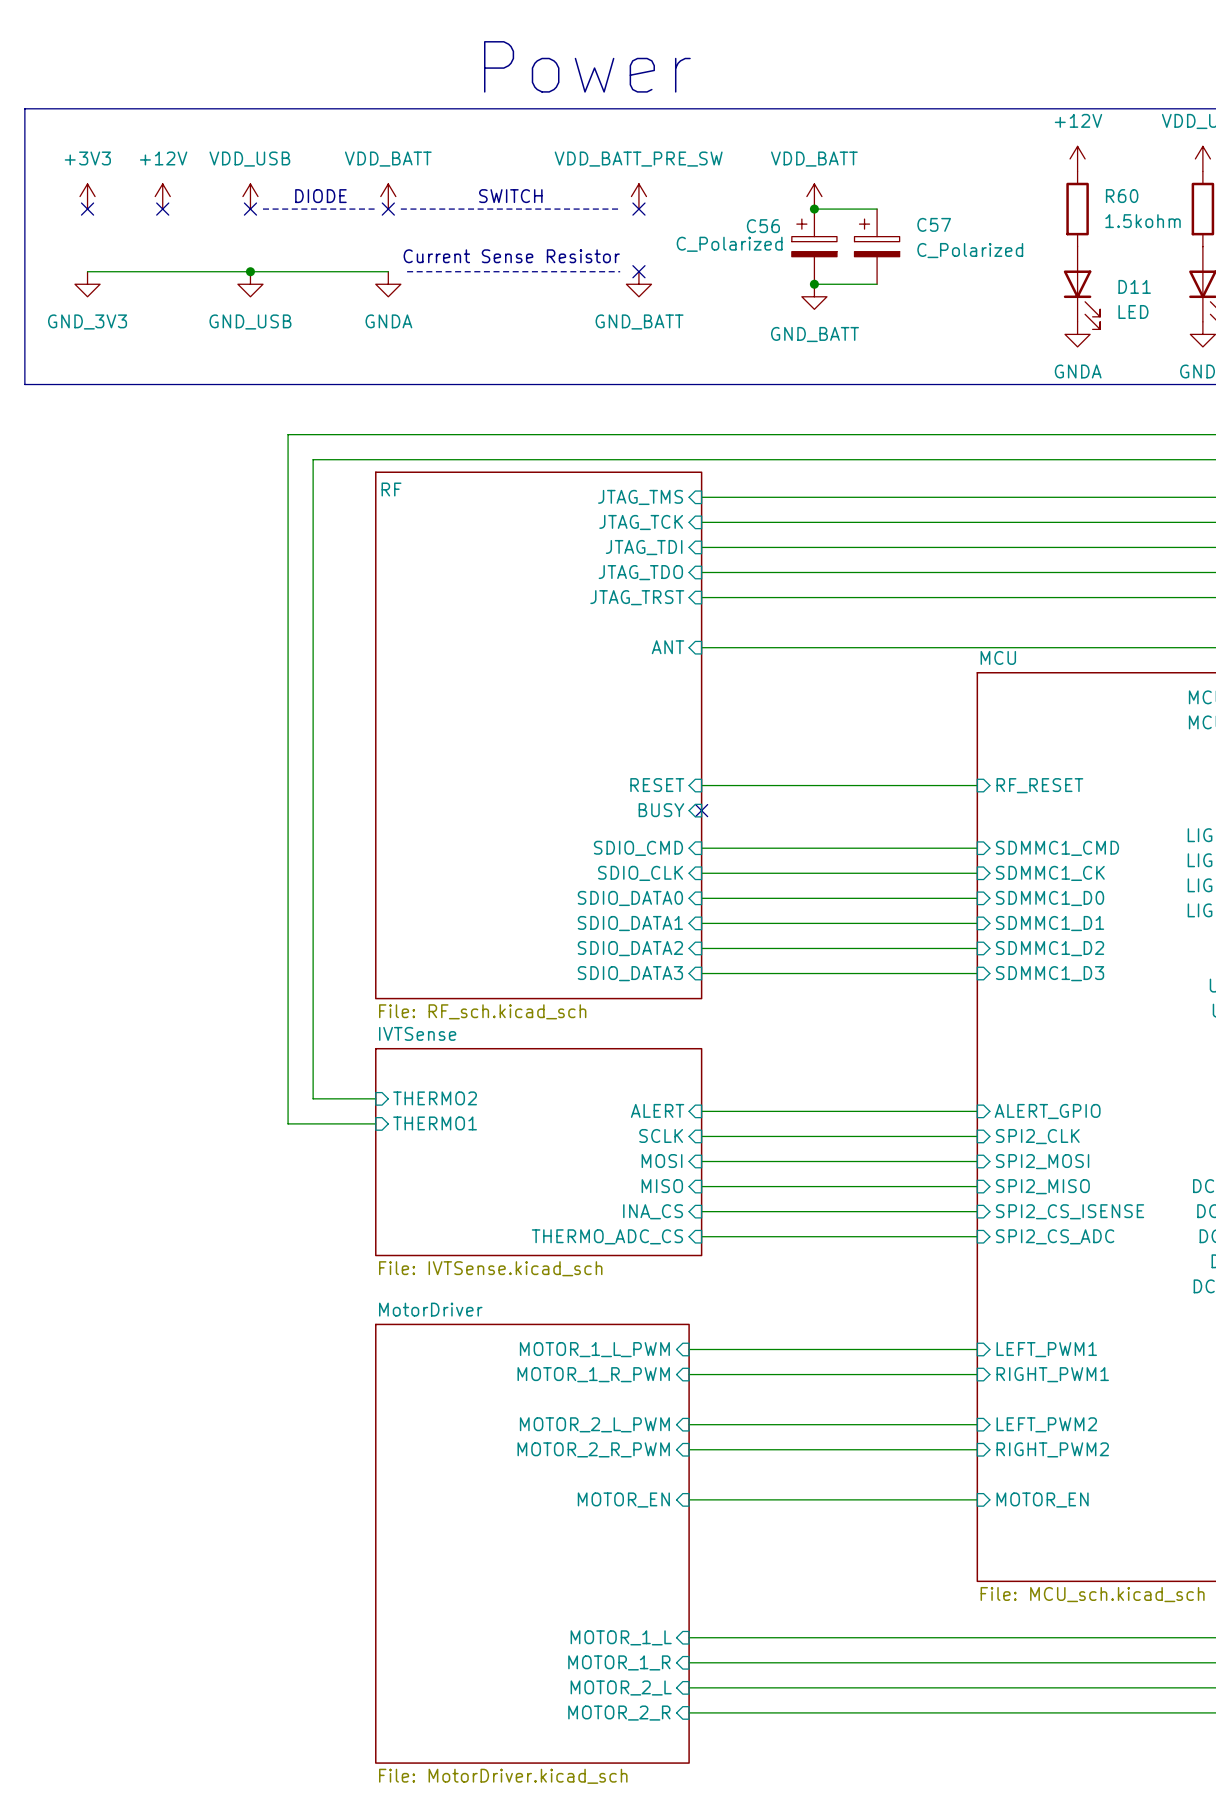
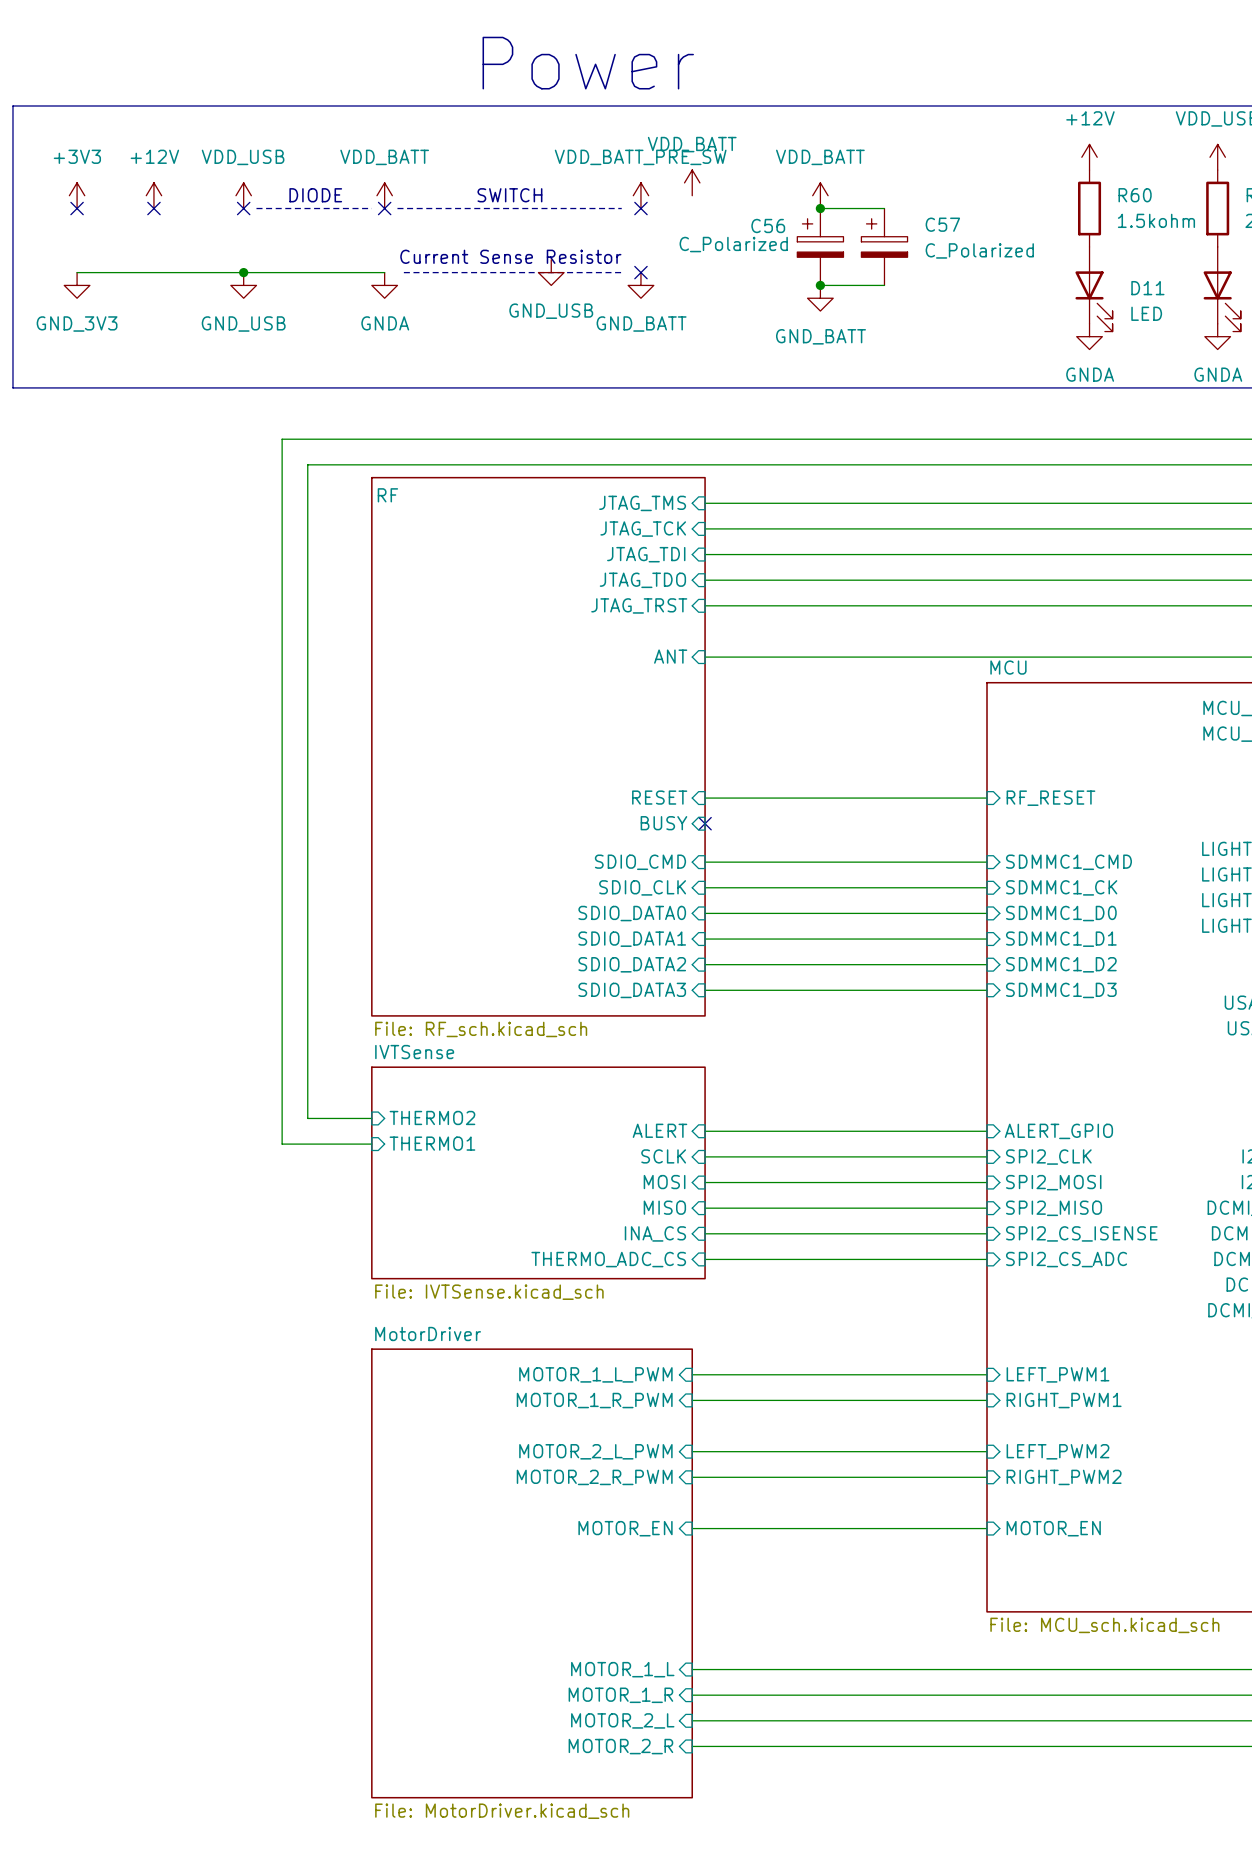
power symbol: none -> VDD_BATT (692, 182)
power symbol: none -> GND_USB (551, 272)

